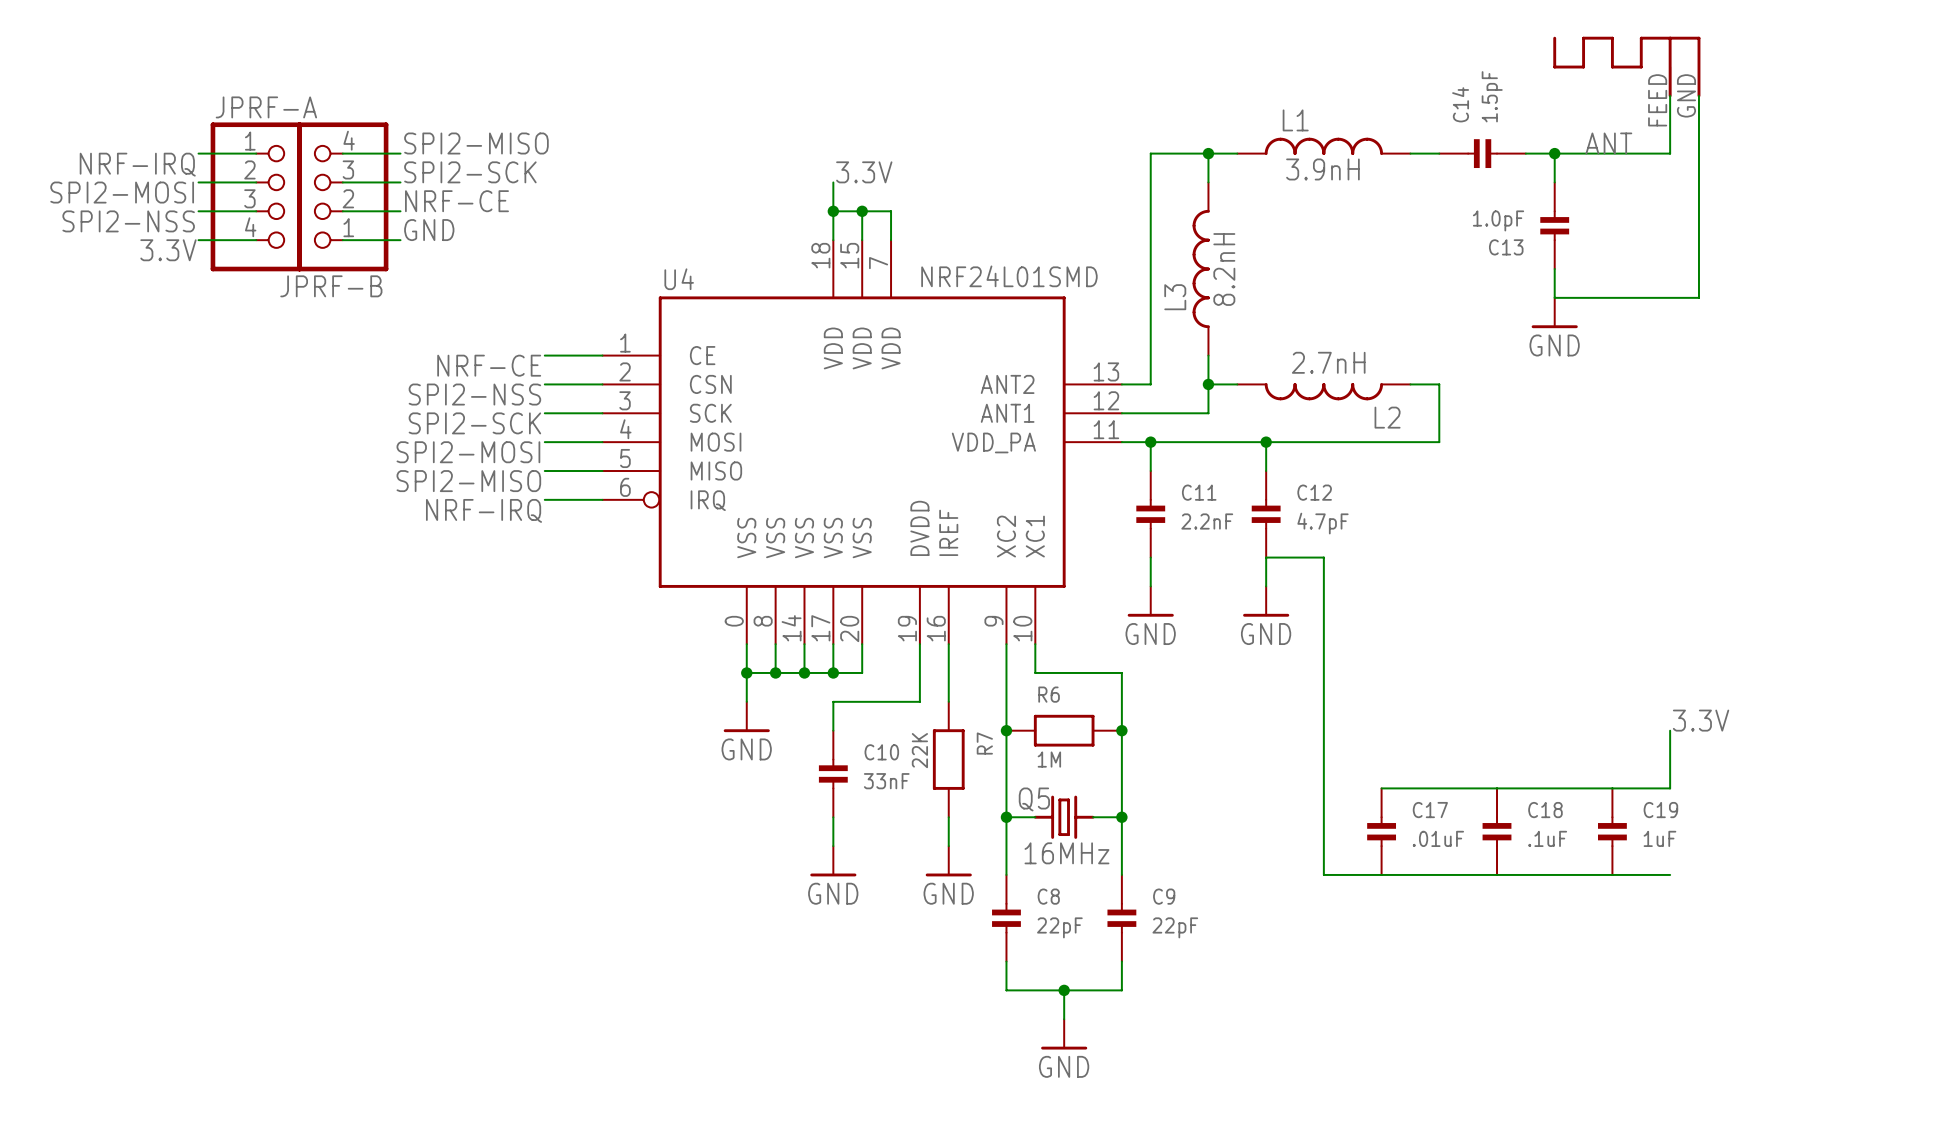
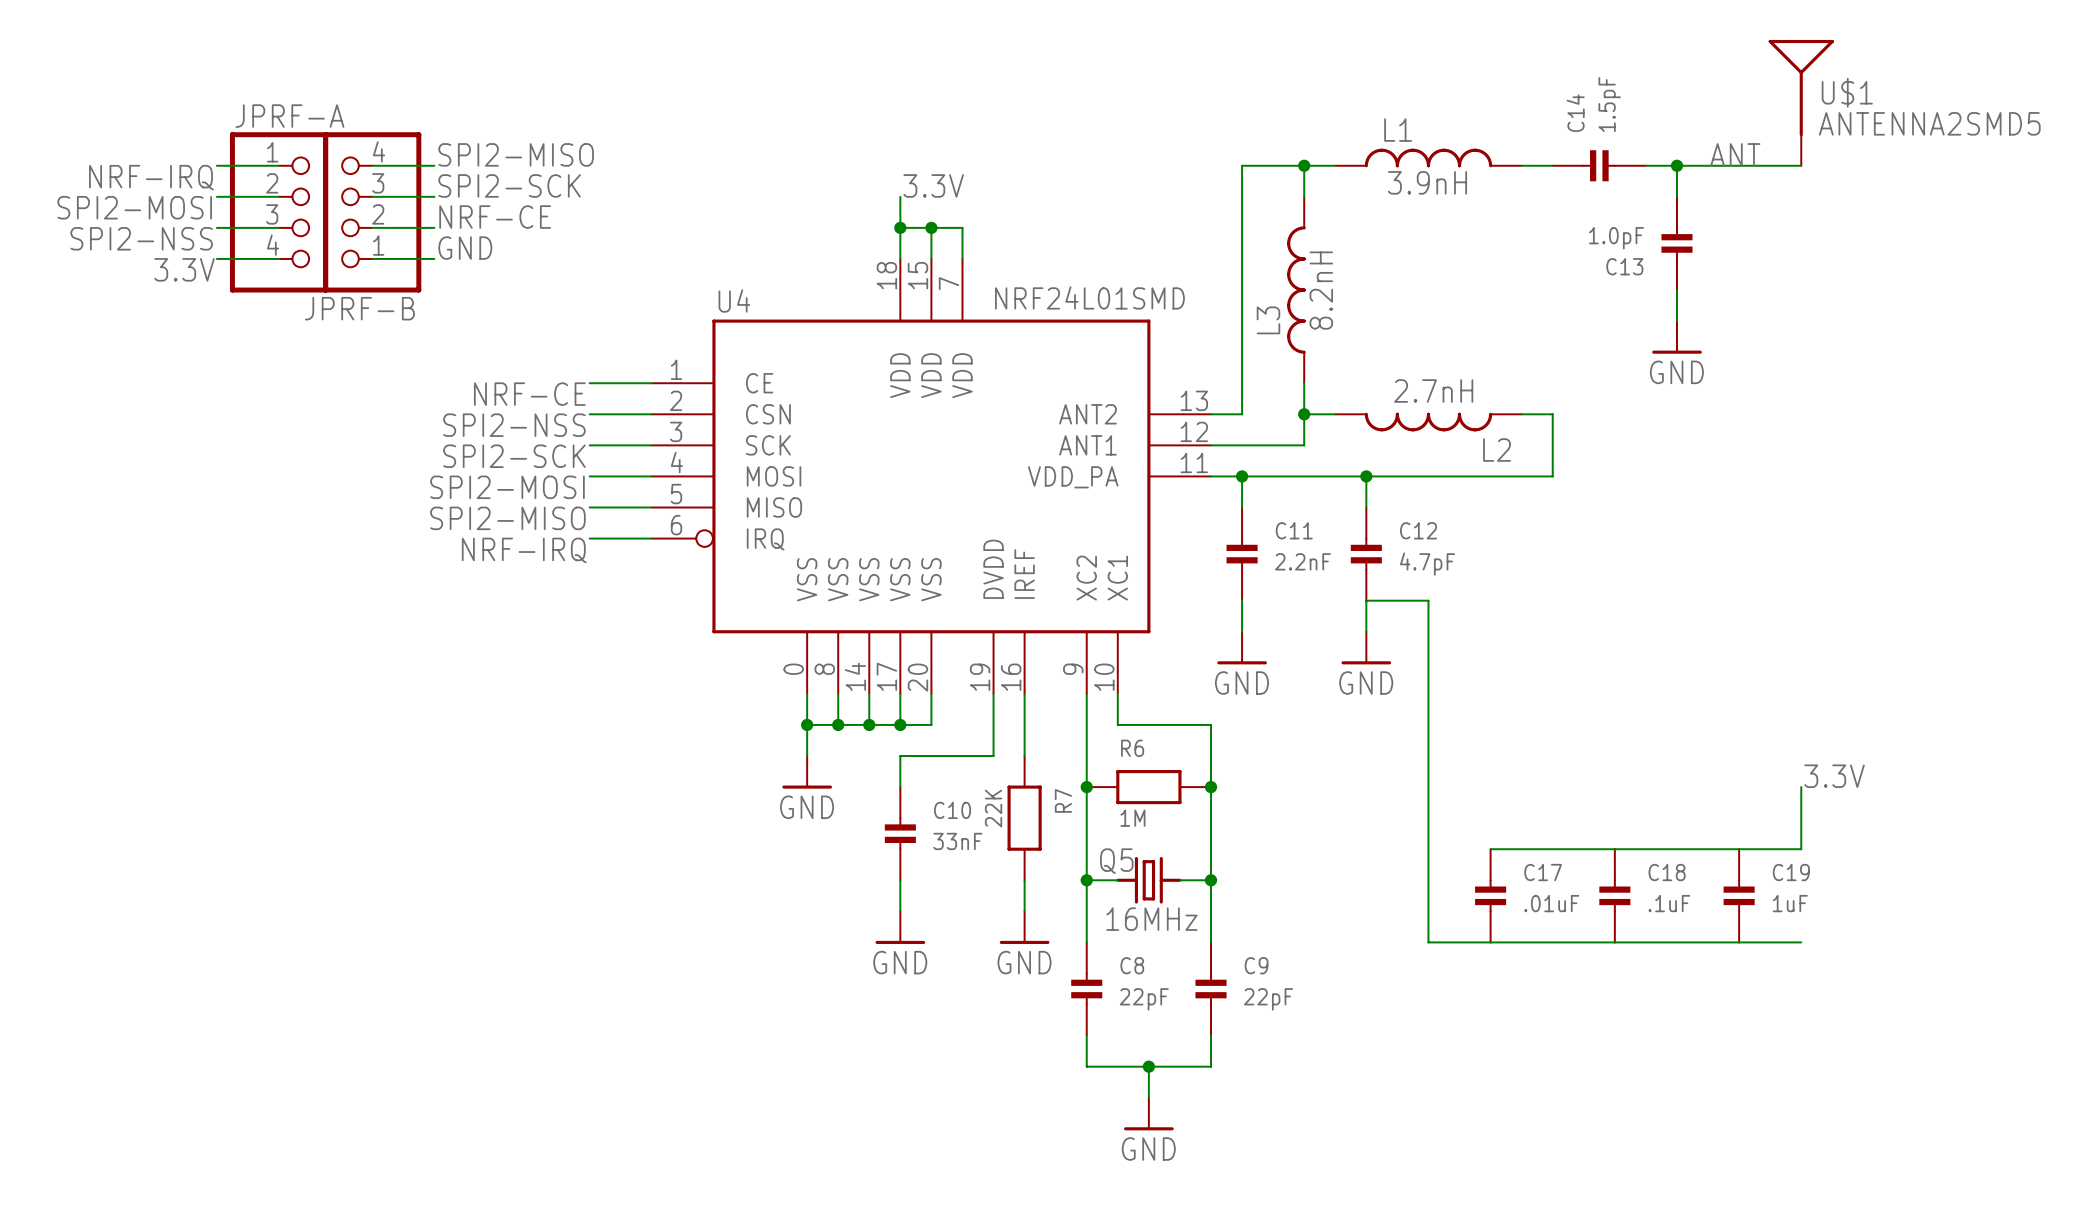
part: (1626, 67) -> none
U$1: none -> ANTENNA2SMD5 (1801, 102)
wire: (1698, 95) (1698, 297) (1554, 297) -> none

